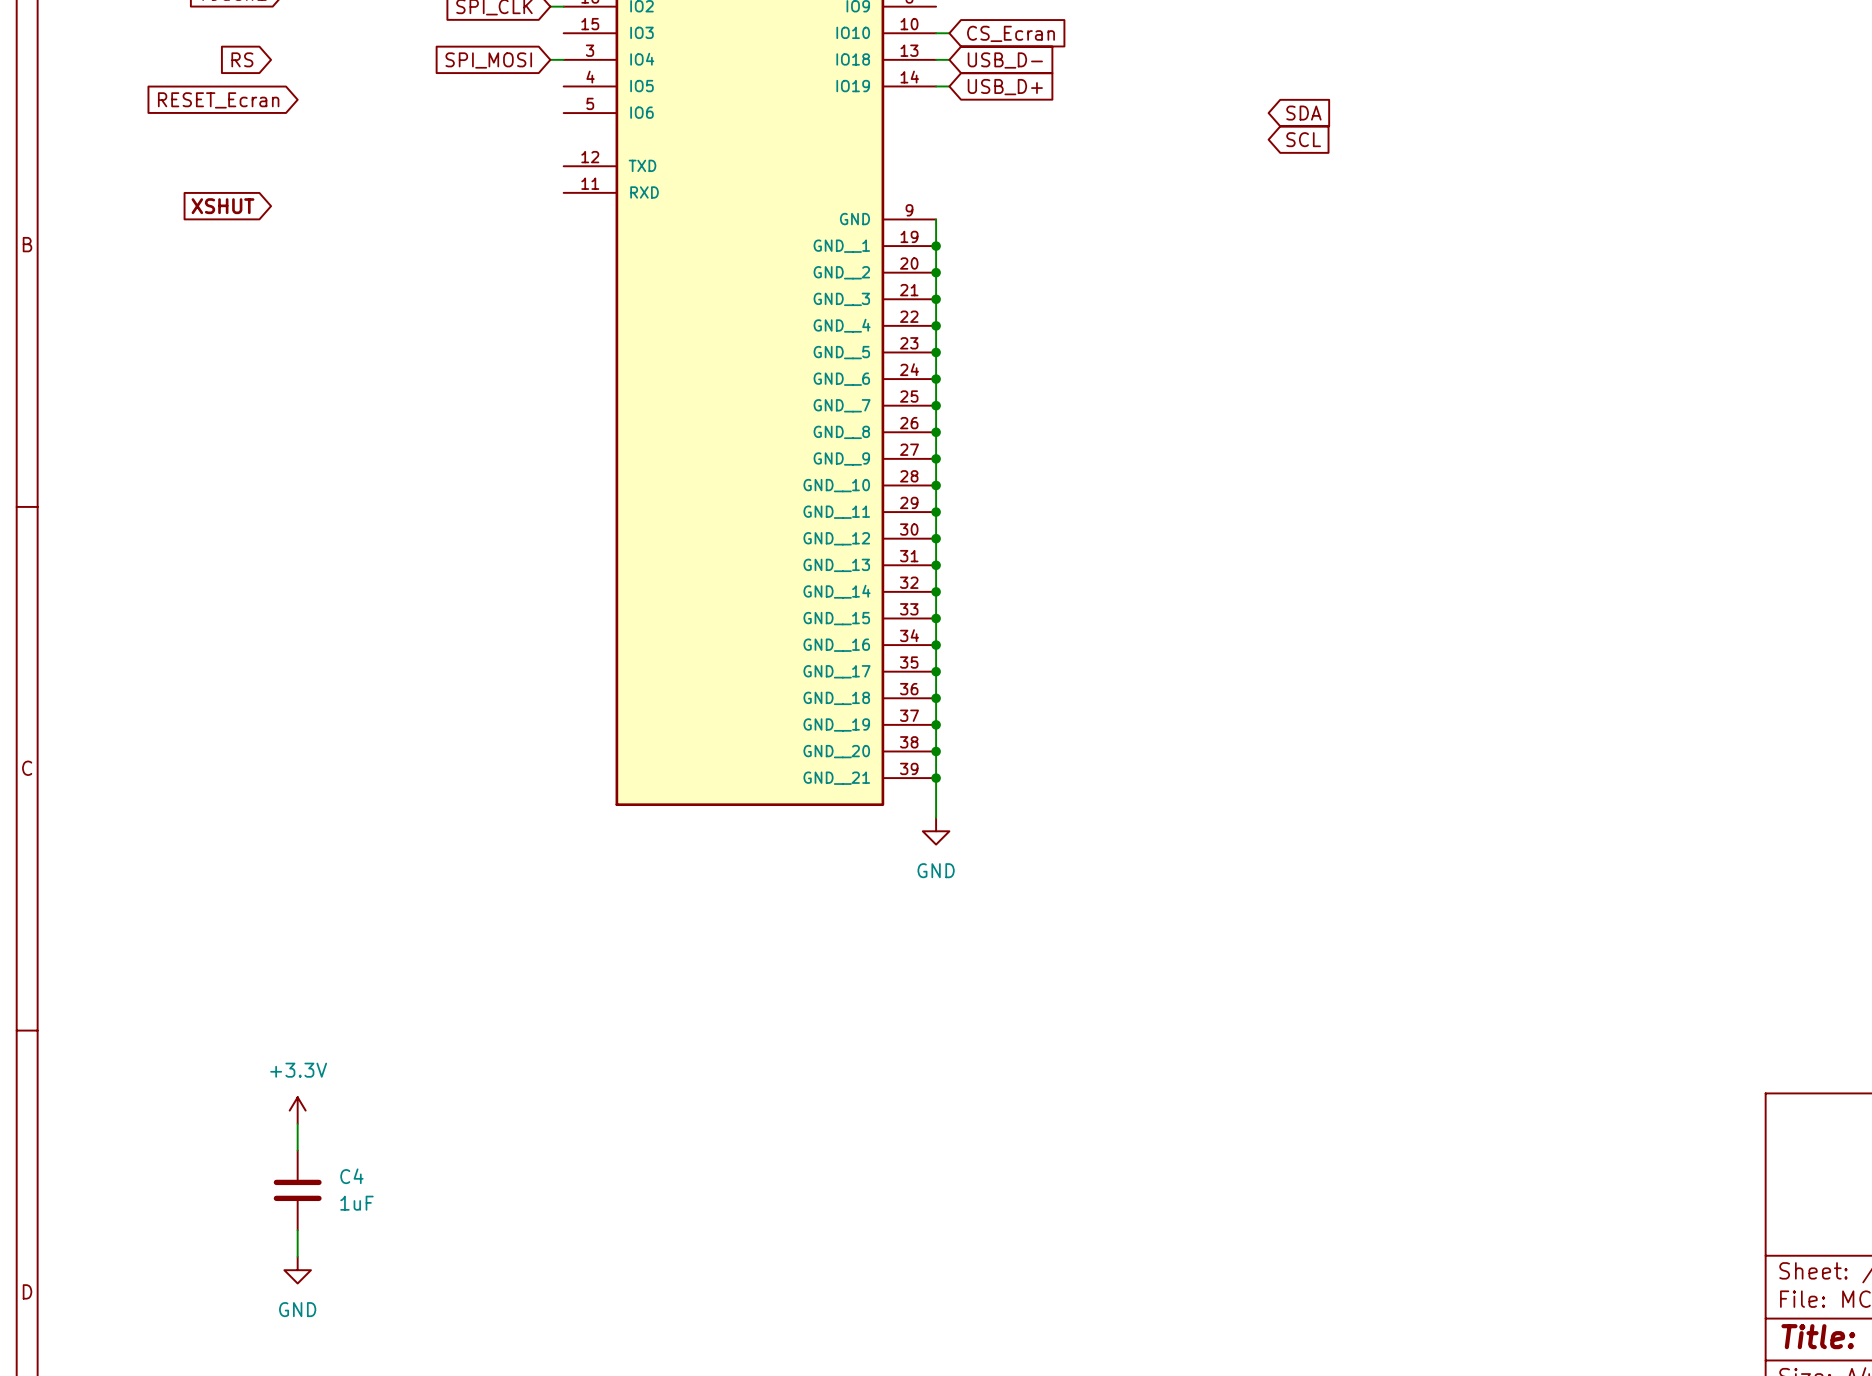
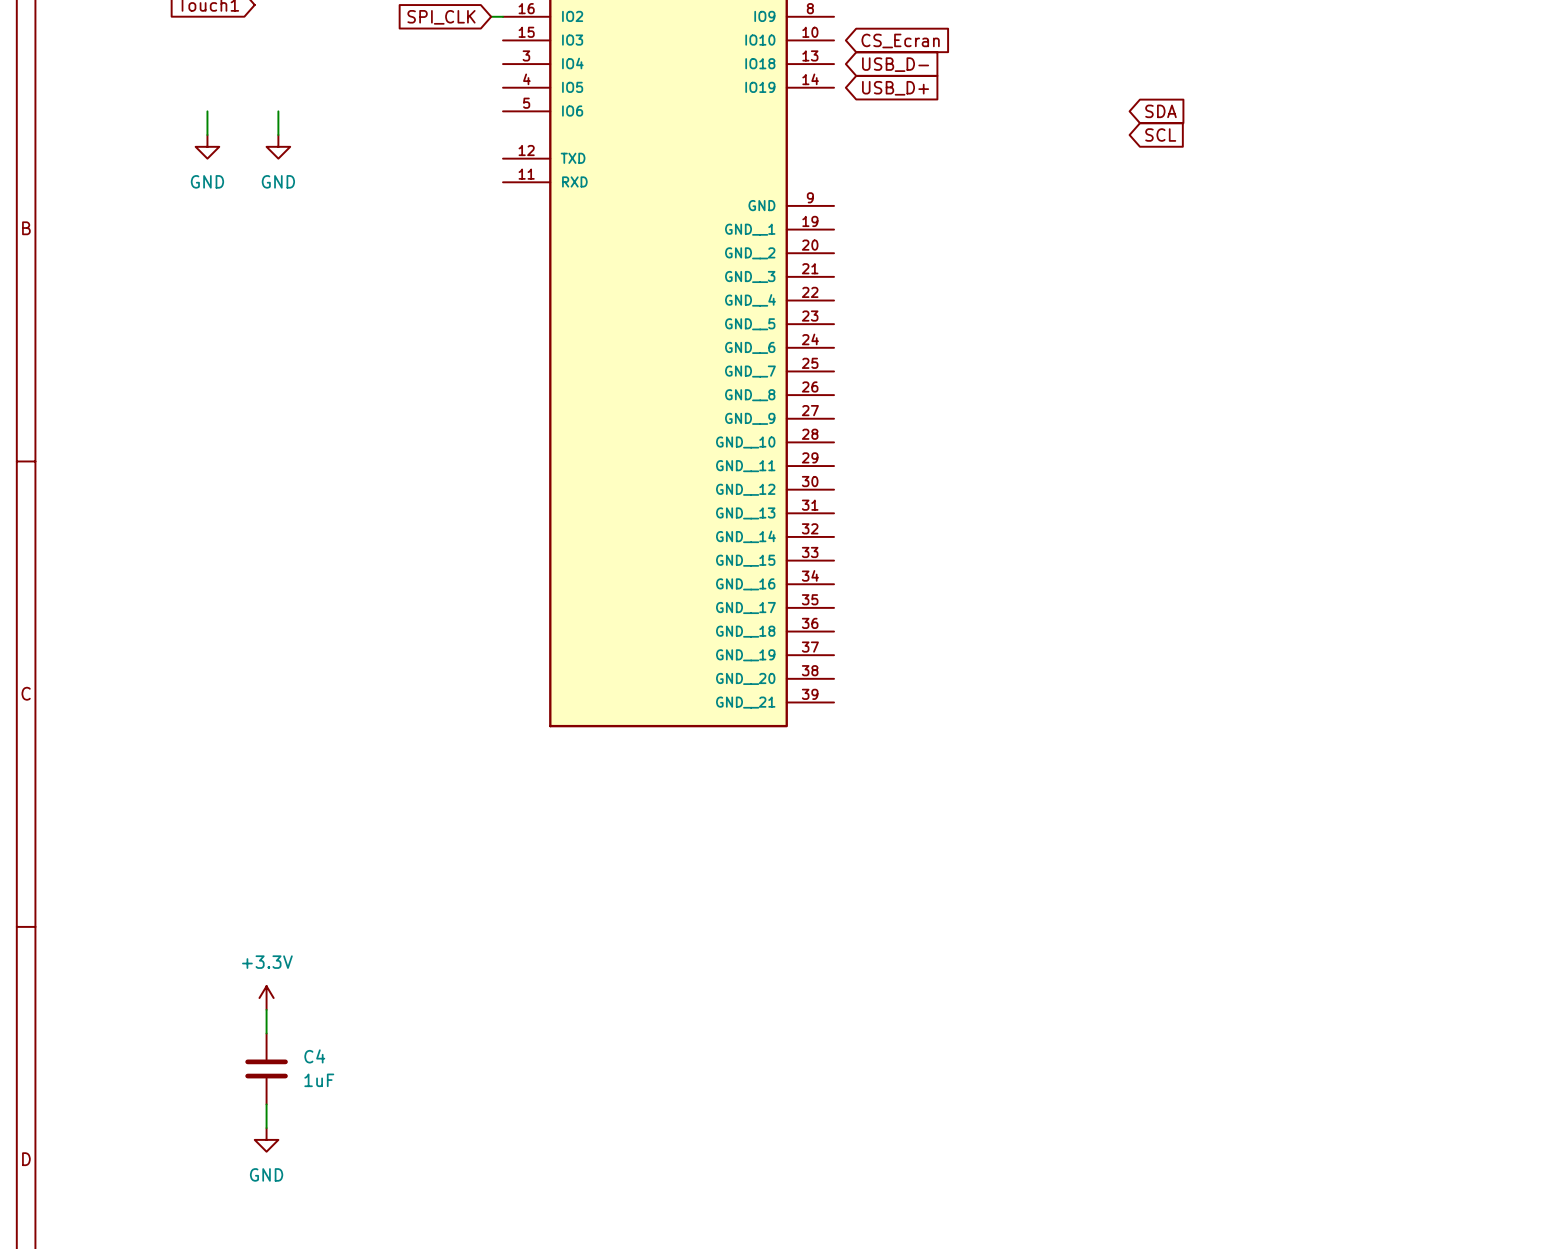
wire: (936, 33) (949, 33) -> none
global label: RS (242, 59) -> none
wire: (550, 59) (563, 59) -> none
wire: (936, 59) (949, 59) -> none
global label: SPI_MOSI (488, 60) -> none
wire: (936, 86) (949, 86) -> none
global label: RESET_Ecran (218, 100) -> none
wire: none -> (207, 111) (207, 135)
wire: none -> (278, 111) (278, 135)
power symbol: none -> GND (207, 146)
power symbol: none -> GND (278, 146)
global label: XSHUT (223, 206) -> none
wire: (936, 219) (936, 817) -> none
junction: (936, 246) -> none
junction: (936, 272) -> none
junction: (936, 299) -> none
junction: (936, 325) -> none
junction: (936, 352) -> none
junction: (936, 379) -> none
junction: (936, 405) -> none
junction: (936, 432) -> none
junction: (936, 458) -> none
junction: (936, 485) -> none
junction: (936, 512) -> none
junction: (936, 538) -> none
junction: (936, 565) -> none
junction: (936, 591) -> none
junction: (936, 618) -> none
junction: (936, 645) -> none
junction: (936, 671) -> none
junction: (936, 698) -> none
junction: (936, 724) -> none
junction: (936, 751) -> none
junction: (936, 778) -> none
power symbol: GND (936, 831) -> none

